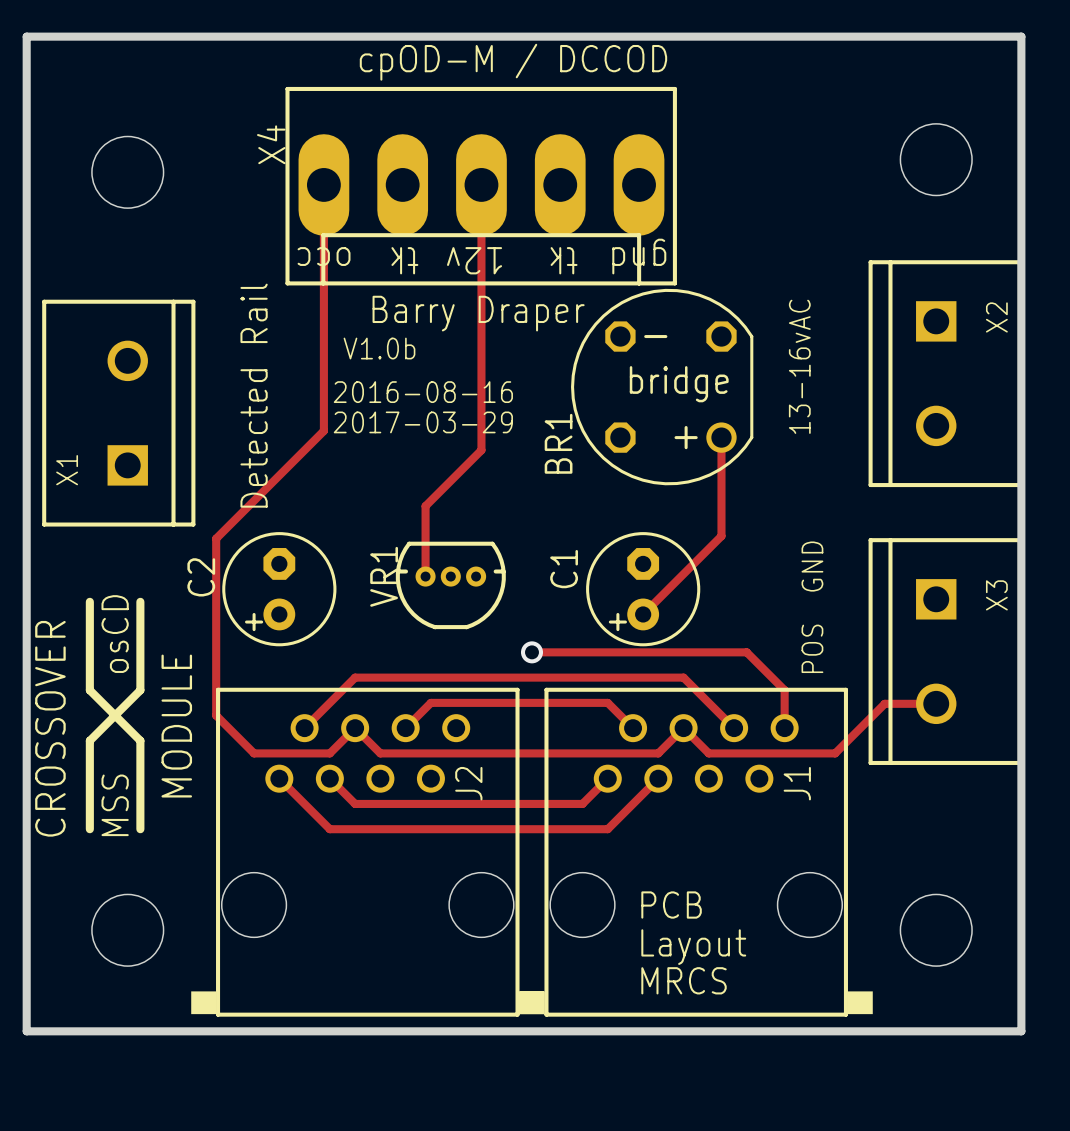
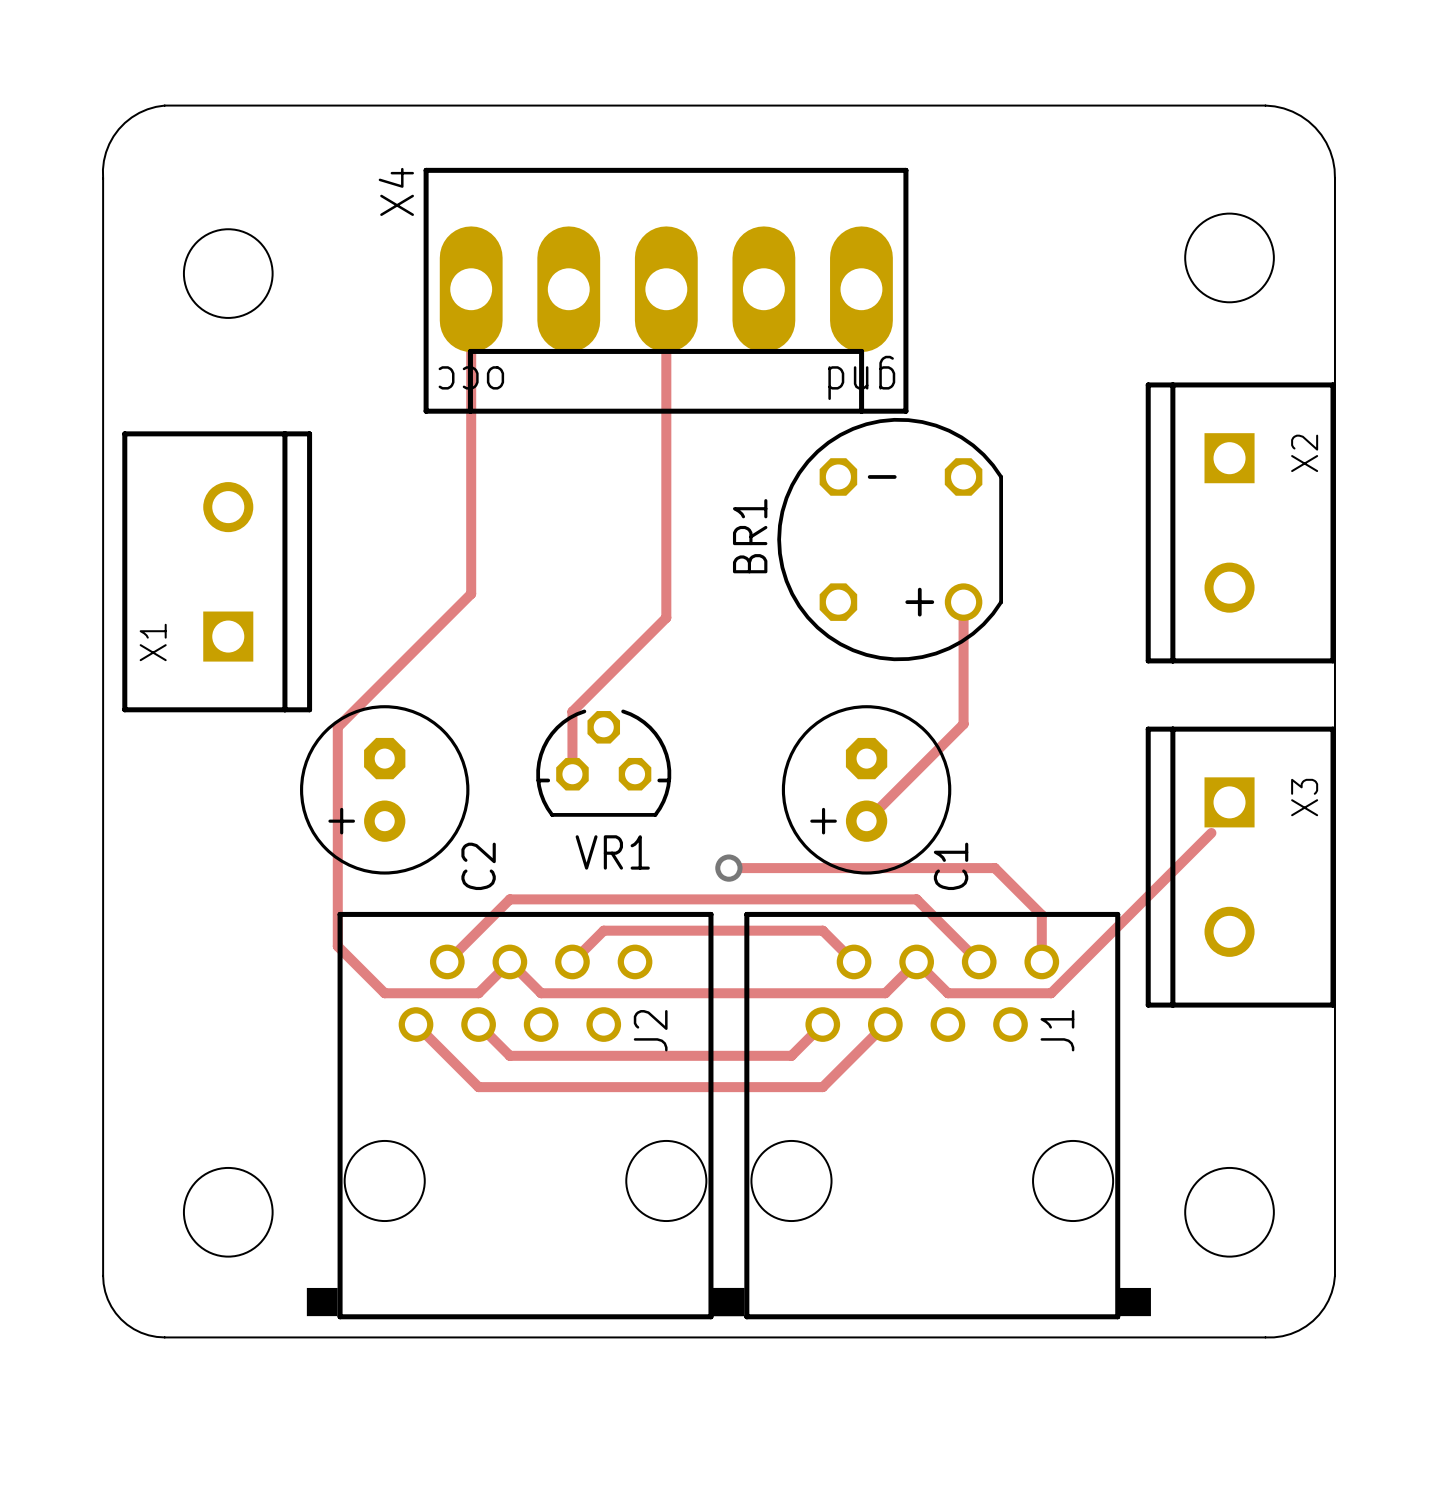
board edge: (26, 36) (26, 1031) (1021, 1031) (1021, 36) (26, 36) -> none
drawing: none -> [102, 105, 1335, 1338]
text: cpOD-M / DCCOD (513, 62) -> none
X4 name position: X4 (271, 144) -> X4 (396, 191)
text: tk (404, 260) -> none
text: 12v (474, 260) -> none
text: tk (564, 260) -> none
text: Barry Draper (478, 313) -> none
text: V1.0b (379, 348) -> none
text: 13-16vAC (799, 366) -> none
BR1 value: bridge (679, 384) -> none
text: 2016-08-16 (423, 392) -> none
text: Detected Rail (254, 395) -> none
text: 2017-03-29 (423, 422) -> none
BR1 name position: BR1 (558, 443) -> BR1 (750, 536)
track: (425, 506) (425, 576) -> (597, 687) (572, 711) (572, 774)
C2 footprint: [222, 532, 337, 647] -> [300, 705, 470, 875]
C1 footprint: [586, 532, 701, 647] -> [781, 705, 952, 875]
VR1 footprint: [395, 541, 506, 630] -> [536, 709, 672, 817]
C1 name position: C1 (564, 569) -> C1 (951, 866)
VR1 name position: VR1 (384, 576) -> VR1 (612, 852)
C2 name position: C2 (201, 577) -> C2 (478, 866)
line: (89, 601) (89, 690) (140, 740) (140, 829) -> none
line: (140, 601) (140, 690) (89, 740) (89, 829) -> none
text: POS GND (812, 607) -> none
text: osCD (115, 634) -> none
track: (936, 703) (884, 703) (835, 753) (792, 753) -> (1211, 832) (1051, 993)
text: MODULE (176, 726) -> none
text: CROSSOVER (50, 728) -> none
text: MSS (115, 805) -> none
text: PCB (671, 905) -> none
text: Layout (693, 947) -> none
text: MRCS (684, 980) -> none

